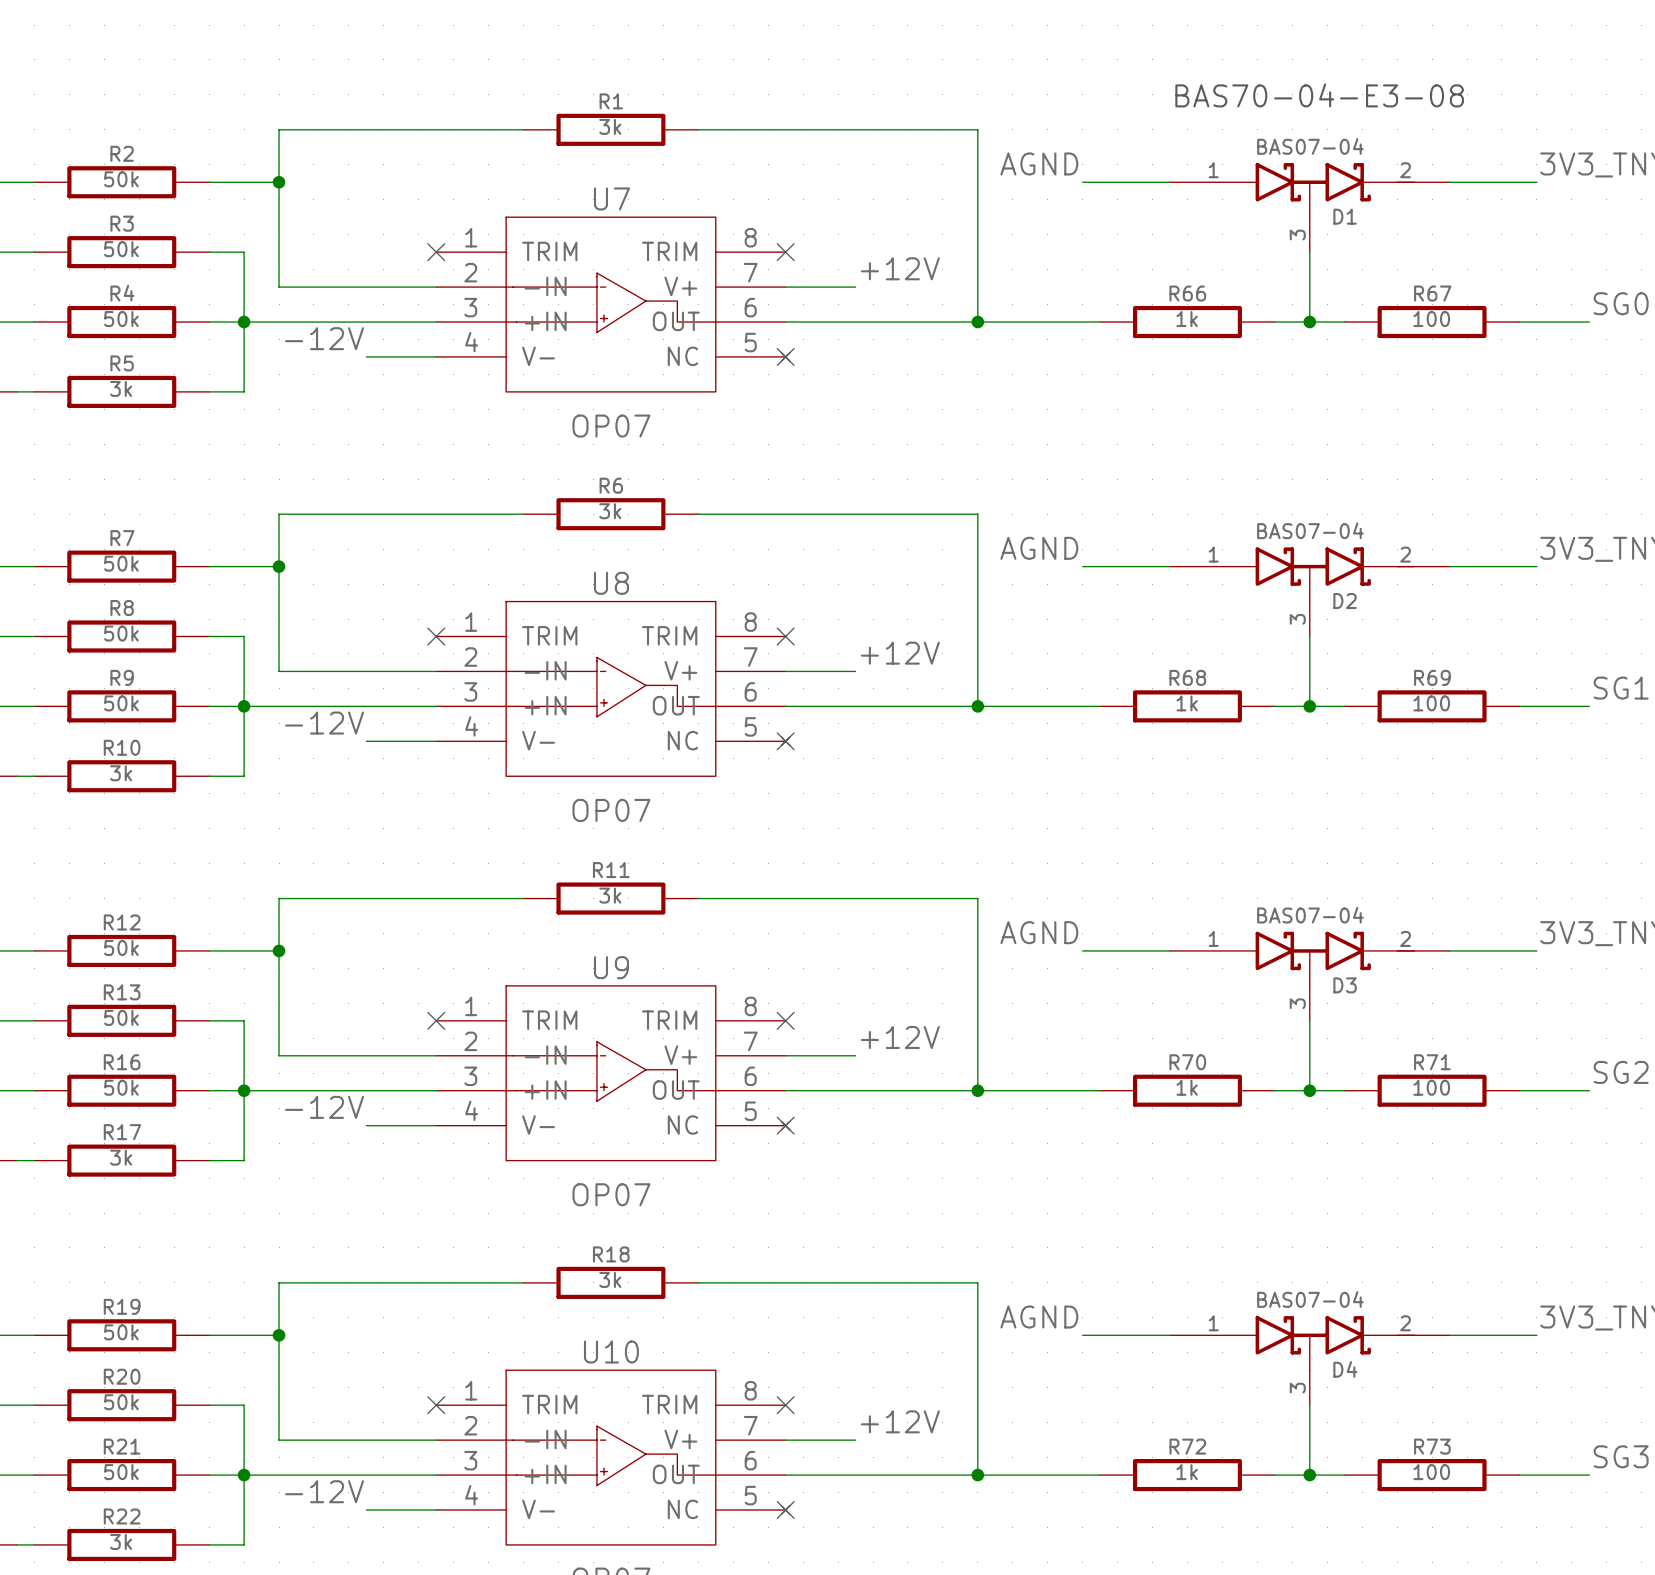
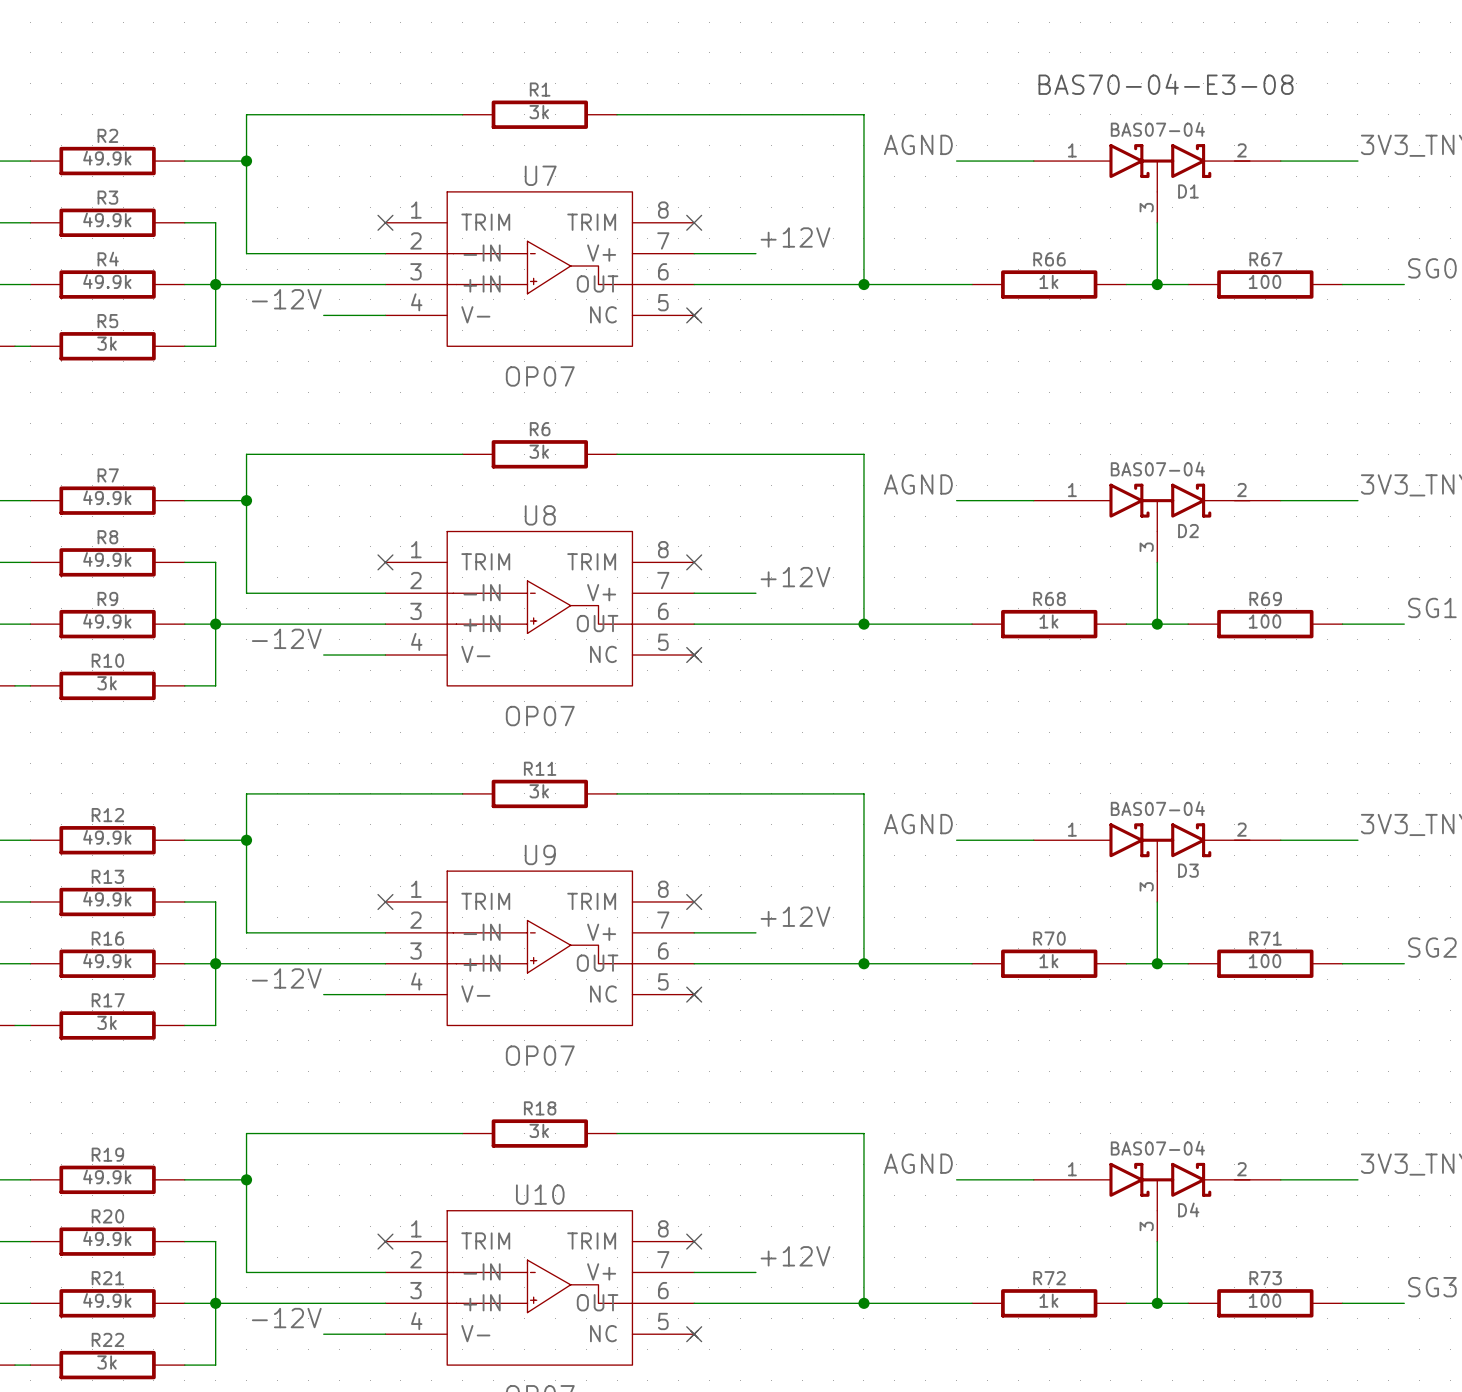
R2 value: 50k (121, 179) -> 49.9k (107, 158)
R3 value: 50k (121, 249) -> 49.9k (107, 219)
R4 value: 50k (121, 319) -> 49.9k (107, 281)
R7 value: 50k (121, 563) -> 49.9k (107, 497)
R8 value: 50k (121, 633) -> 49.9k (107, 559)
R9 value: 50k (121, 703) -> 49.9k (107, 621)
R12 value: 50k (121, 947) -> 49.9k (107, 837)
R13 value: 50k (121, 1017) -> 49.9k (107, 899)
R16 value: 50k (121, 1087) -> 49.9k (107, 960)
R19 value: 50k (121, 1332) -> 49.9k (107, 1176)
R20 value: 50k (121, 1402) -> 49.9k (107, 1238)
R21 value: 50k (121, 1472) -> 49.9k (107, 1300)

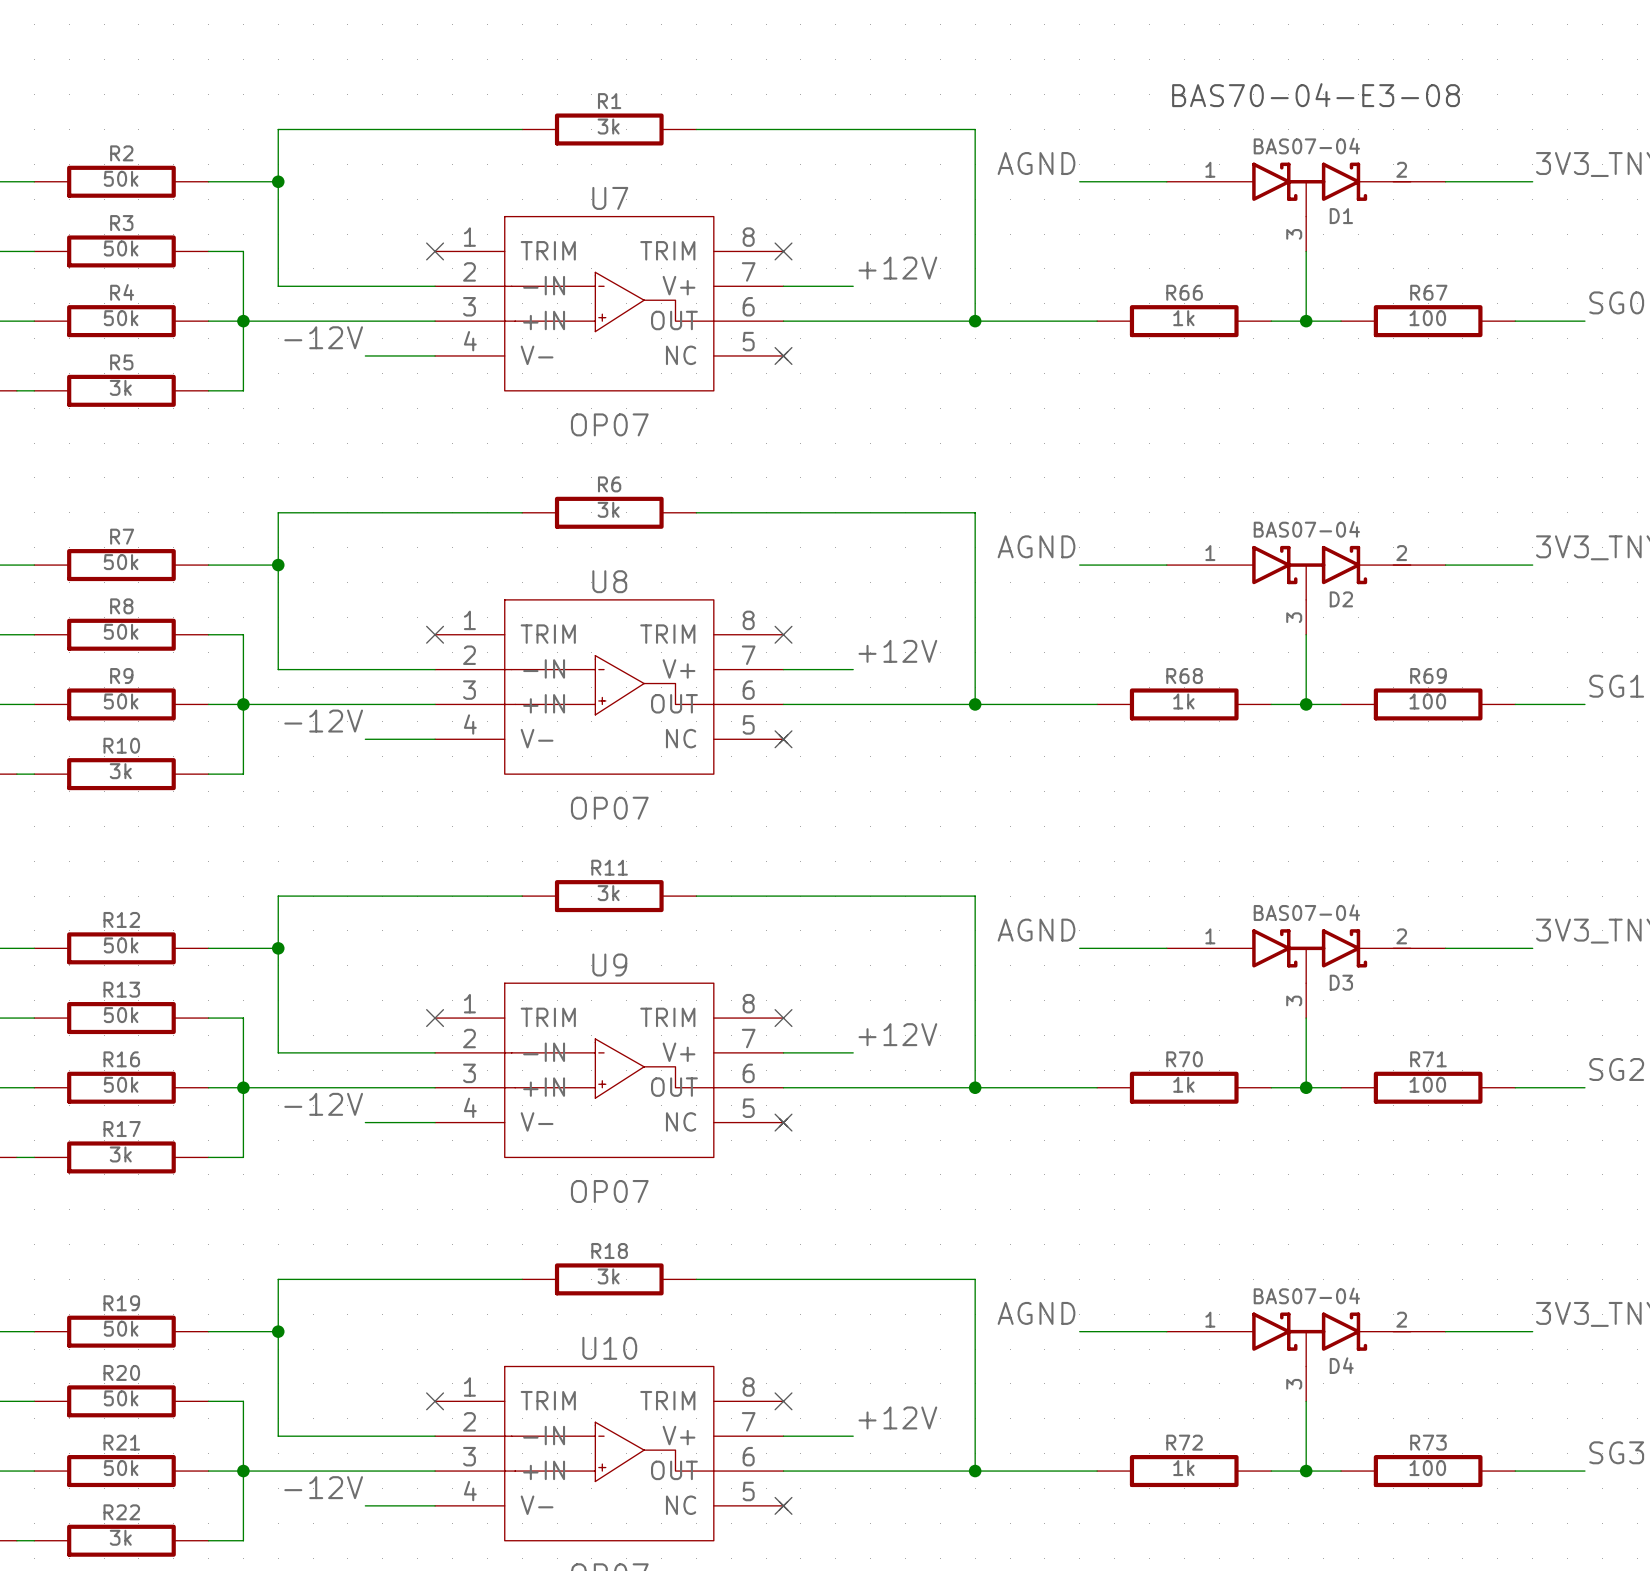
R2 value: 49.9k (107, 158) -> 50k (121, 178)
R3 value: 49.9k (107, 219) -> 50k (121, 248)
R4 value: 49.9k (107, 281) -> 50k (121, 318)
R7 value: 49.9k (107, 497) -> 50k (121, 562)
R8 value: 49.9k (107, 559) -> 50k (121, 631)
R9 value: 49.9k (107, 621) -> 50k (121, 701)
R12 value: 49.9k (107, 837) -> 50k (121, 945)
R13 value: 49.9k (107, 899) -> 50k (121, 1015)
R16 value: 49.9k (107, 960) -> 50k (121, 1084)
R19 value: 49.9k (107, 1176) -> 50k (121, 1328)
R20 value: 49.9k (107, 1238) -> 50k (121, 1398)
R21 value: 49.9k (107, 1300) -> 50k (121, 1468)

